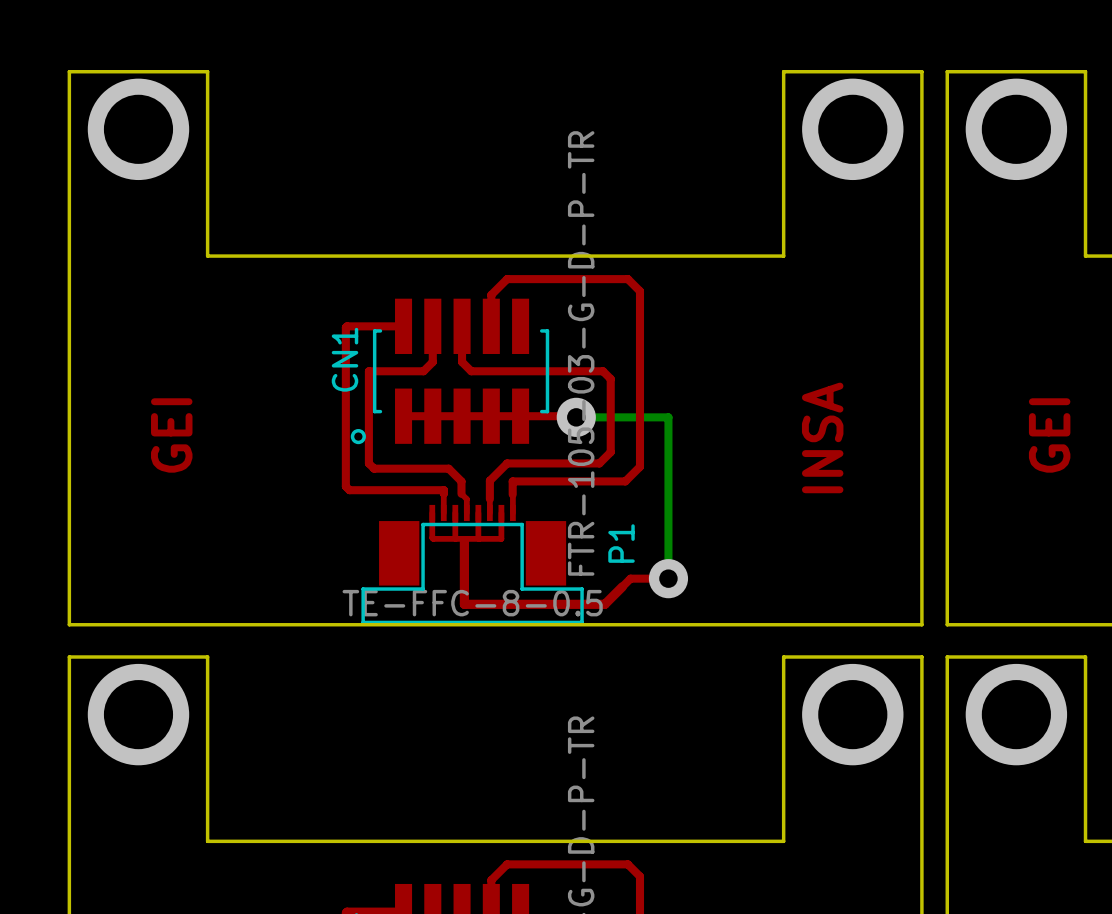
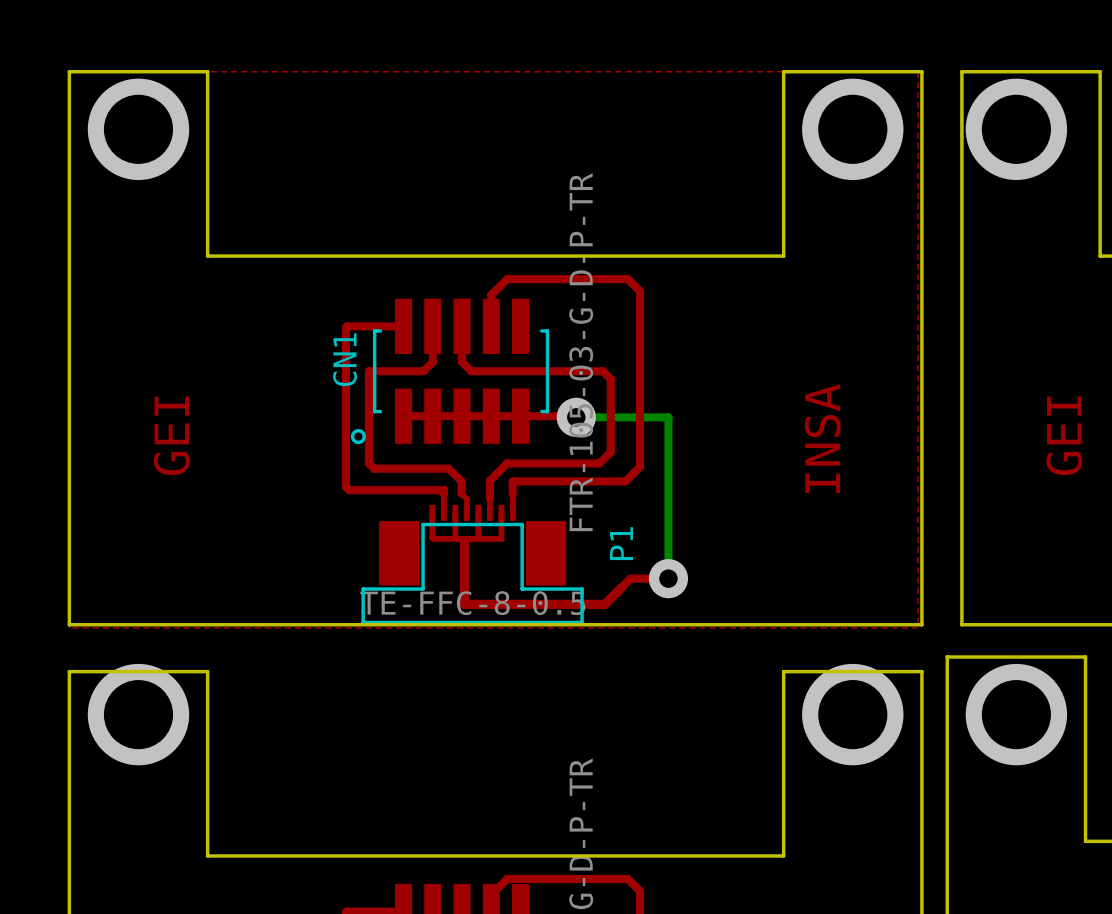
top zone outline: none -> (69, 71) (918, 71) (918, 627) (69, 627) (69, 71)
board edge: (961, 71) (947, 71) (947, 624) (961, 624) -> (961, 71) (961, 624)
board edge: (1085, 71) (1085, 256) (1100, 256) -> (1085, 71) (1100, 71) (1100, 256)
text position: GEI (1049, 435) -> GEI (1064, 435)
board edge: (69, 671) (69, 657) (207, 657) (207, 671) -> (69, 671) (207, 671)
board edge: (783, 671) (783, 657) (921, 657) (921, 671) -> (783, 671) (921, 671)
board edge: (207, 841) (783, 841) -> (207, 841) (207, 855) (783, 855) (783, 841)
top track: (639, 891) (639, 876) (627, 864) (507, 864) (491, 880) (491, 894) -> (639, 891) (627, 879) (507, 879) (491, 894)

